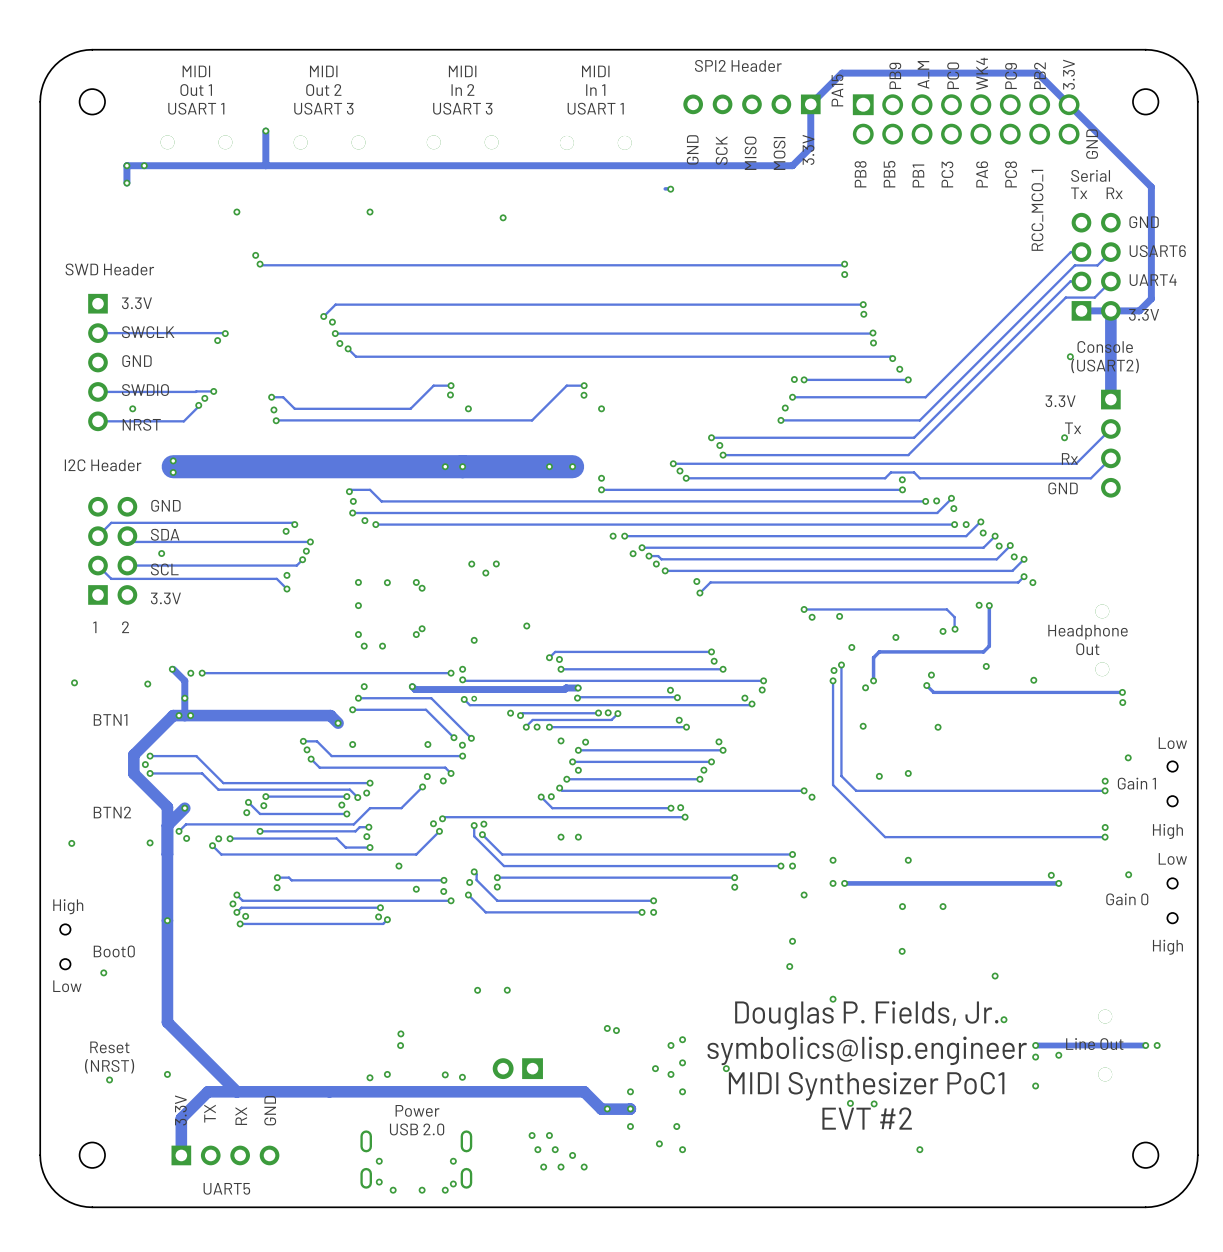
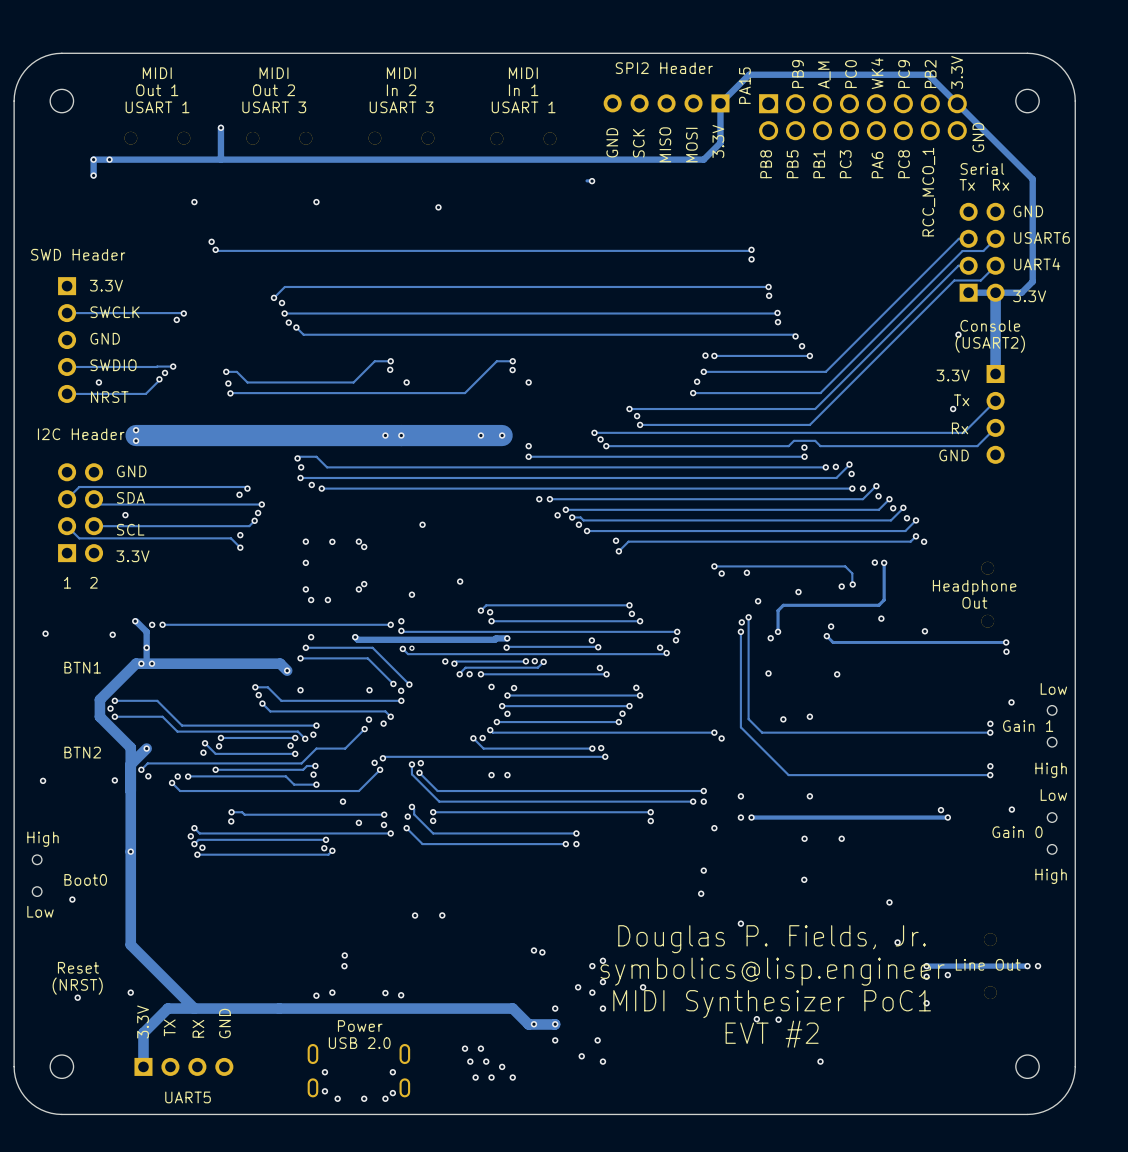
via: (496, 563) -> none
via: (471, 564) -> none
via: none -> (422, 524)
via: (485, 573) -> none
part: (517, 1068) -> none

